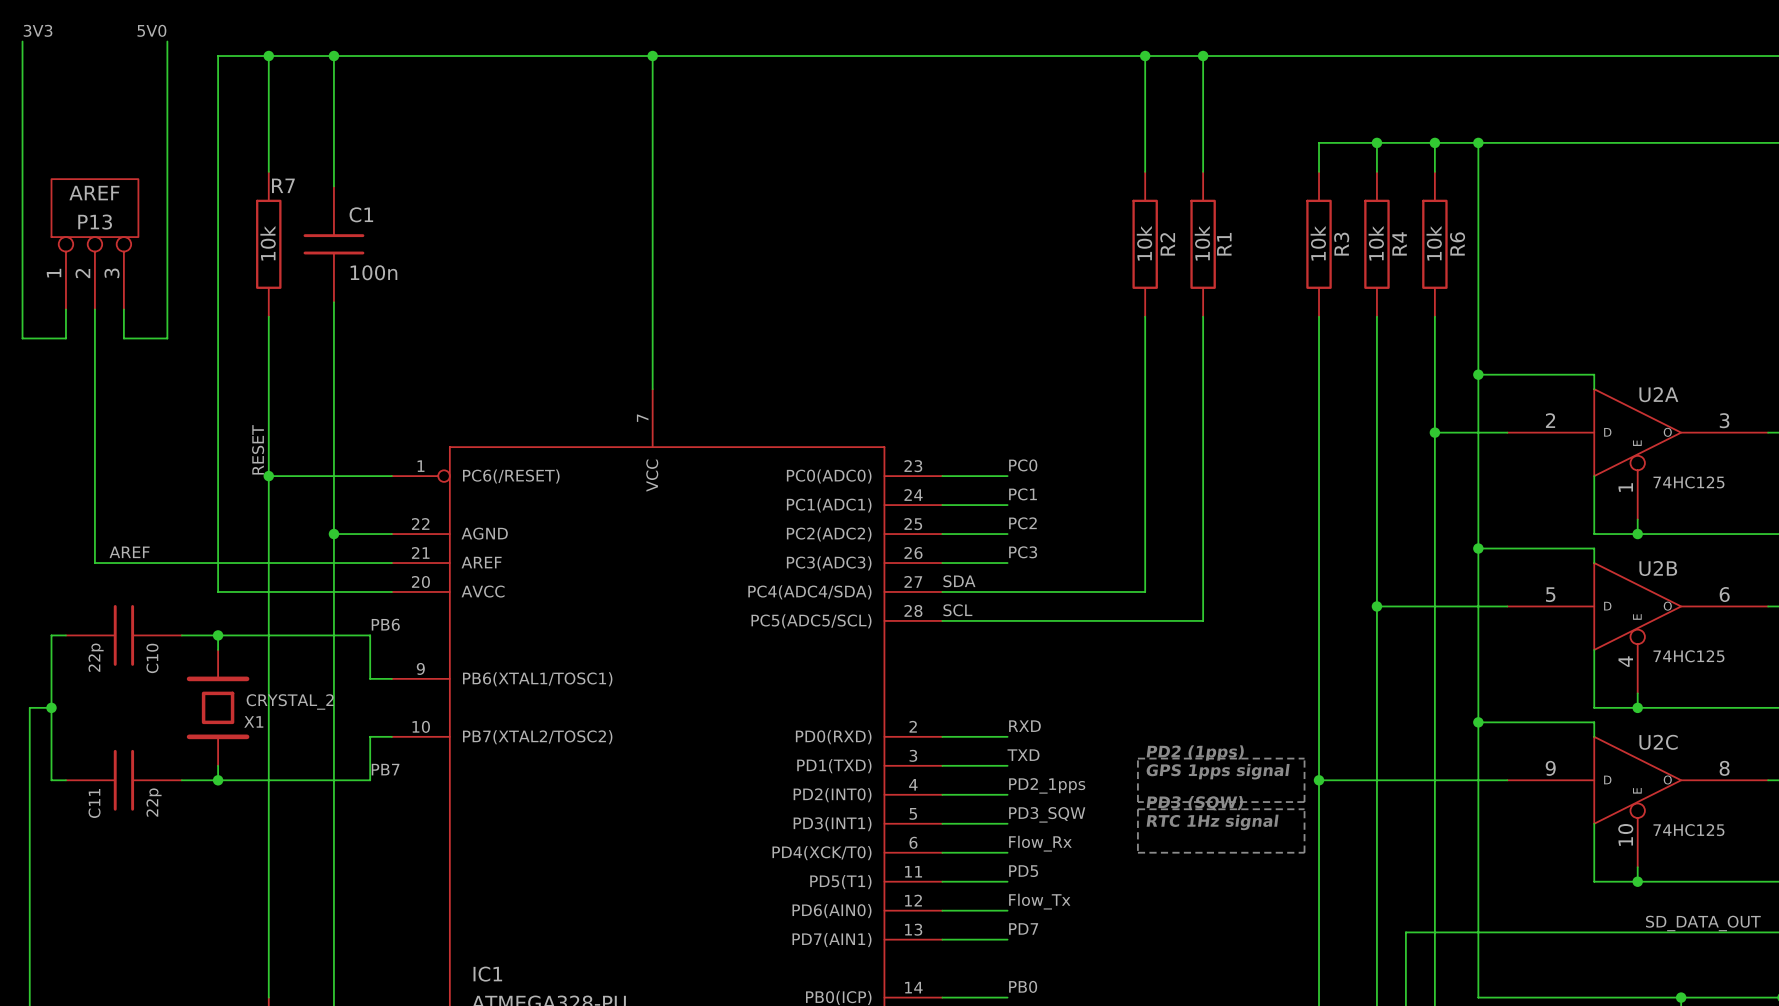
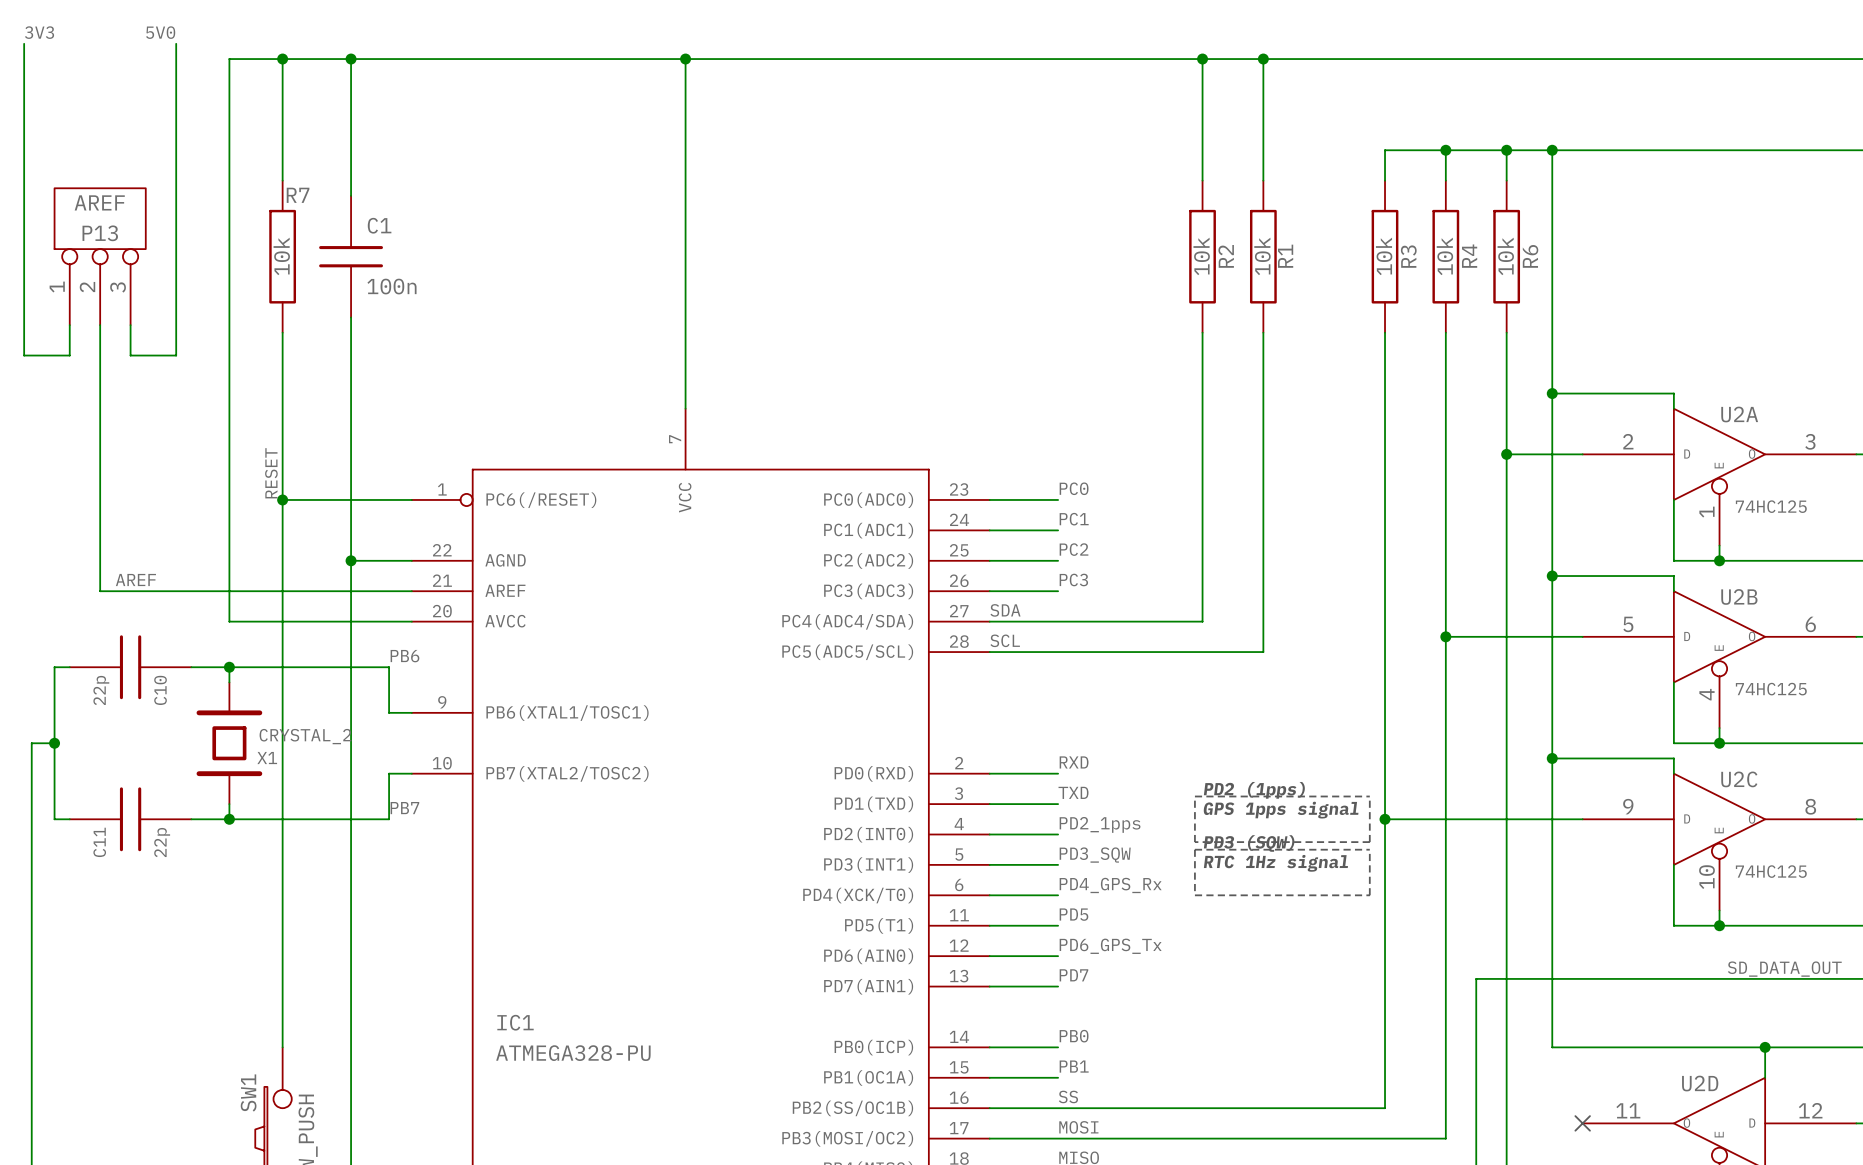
label: Flow_Rx (1040, 843) -> PD4_GPS_Rx (1110, 885)
label: Flow_Tx (1039, 901) -> PD6_GPS_Tx (1110, 946)

